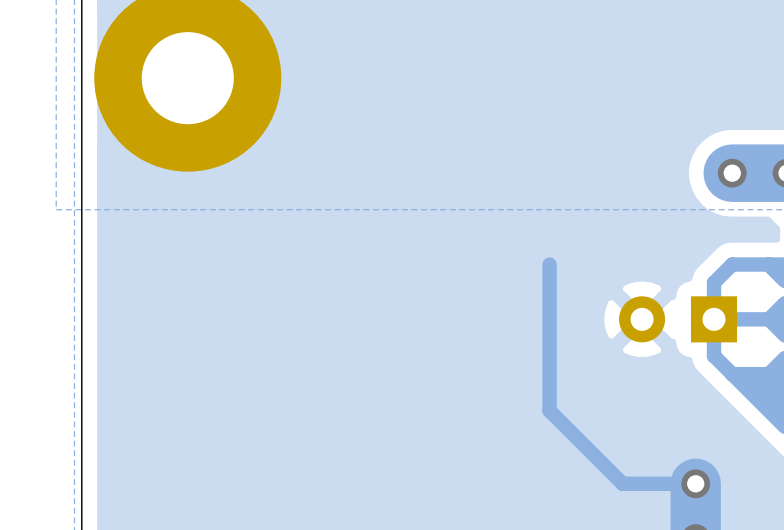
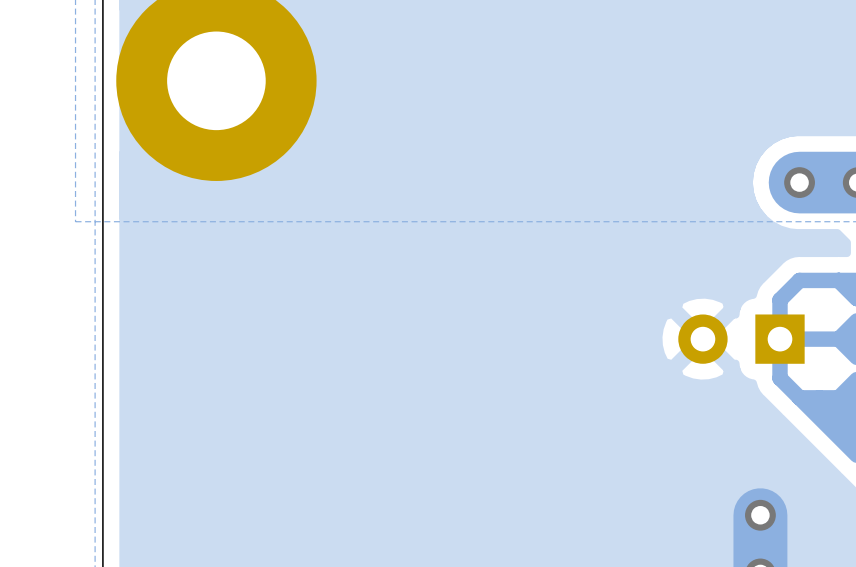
track: (549, 264) (549, 410) (622, 483) (695, 483) -> none

